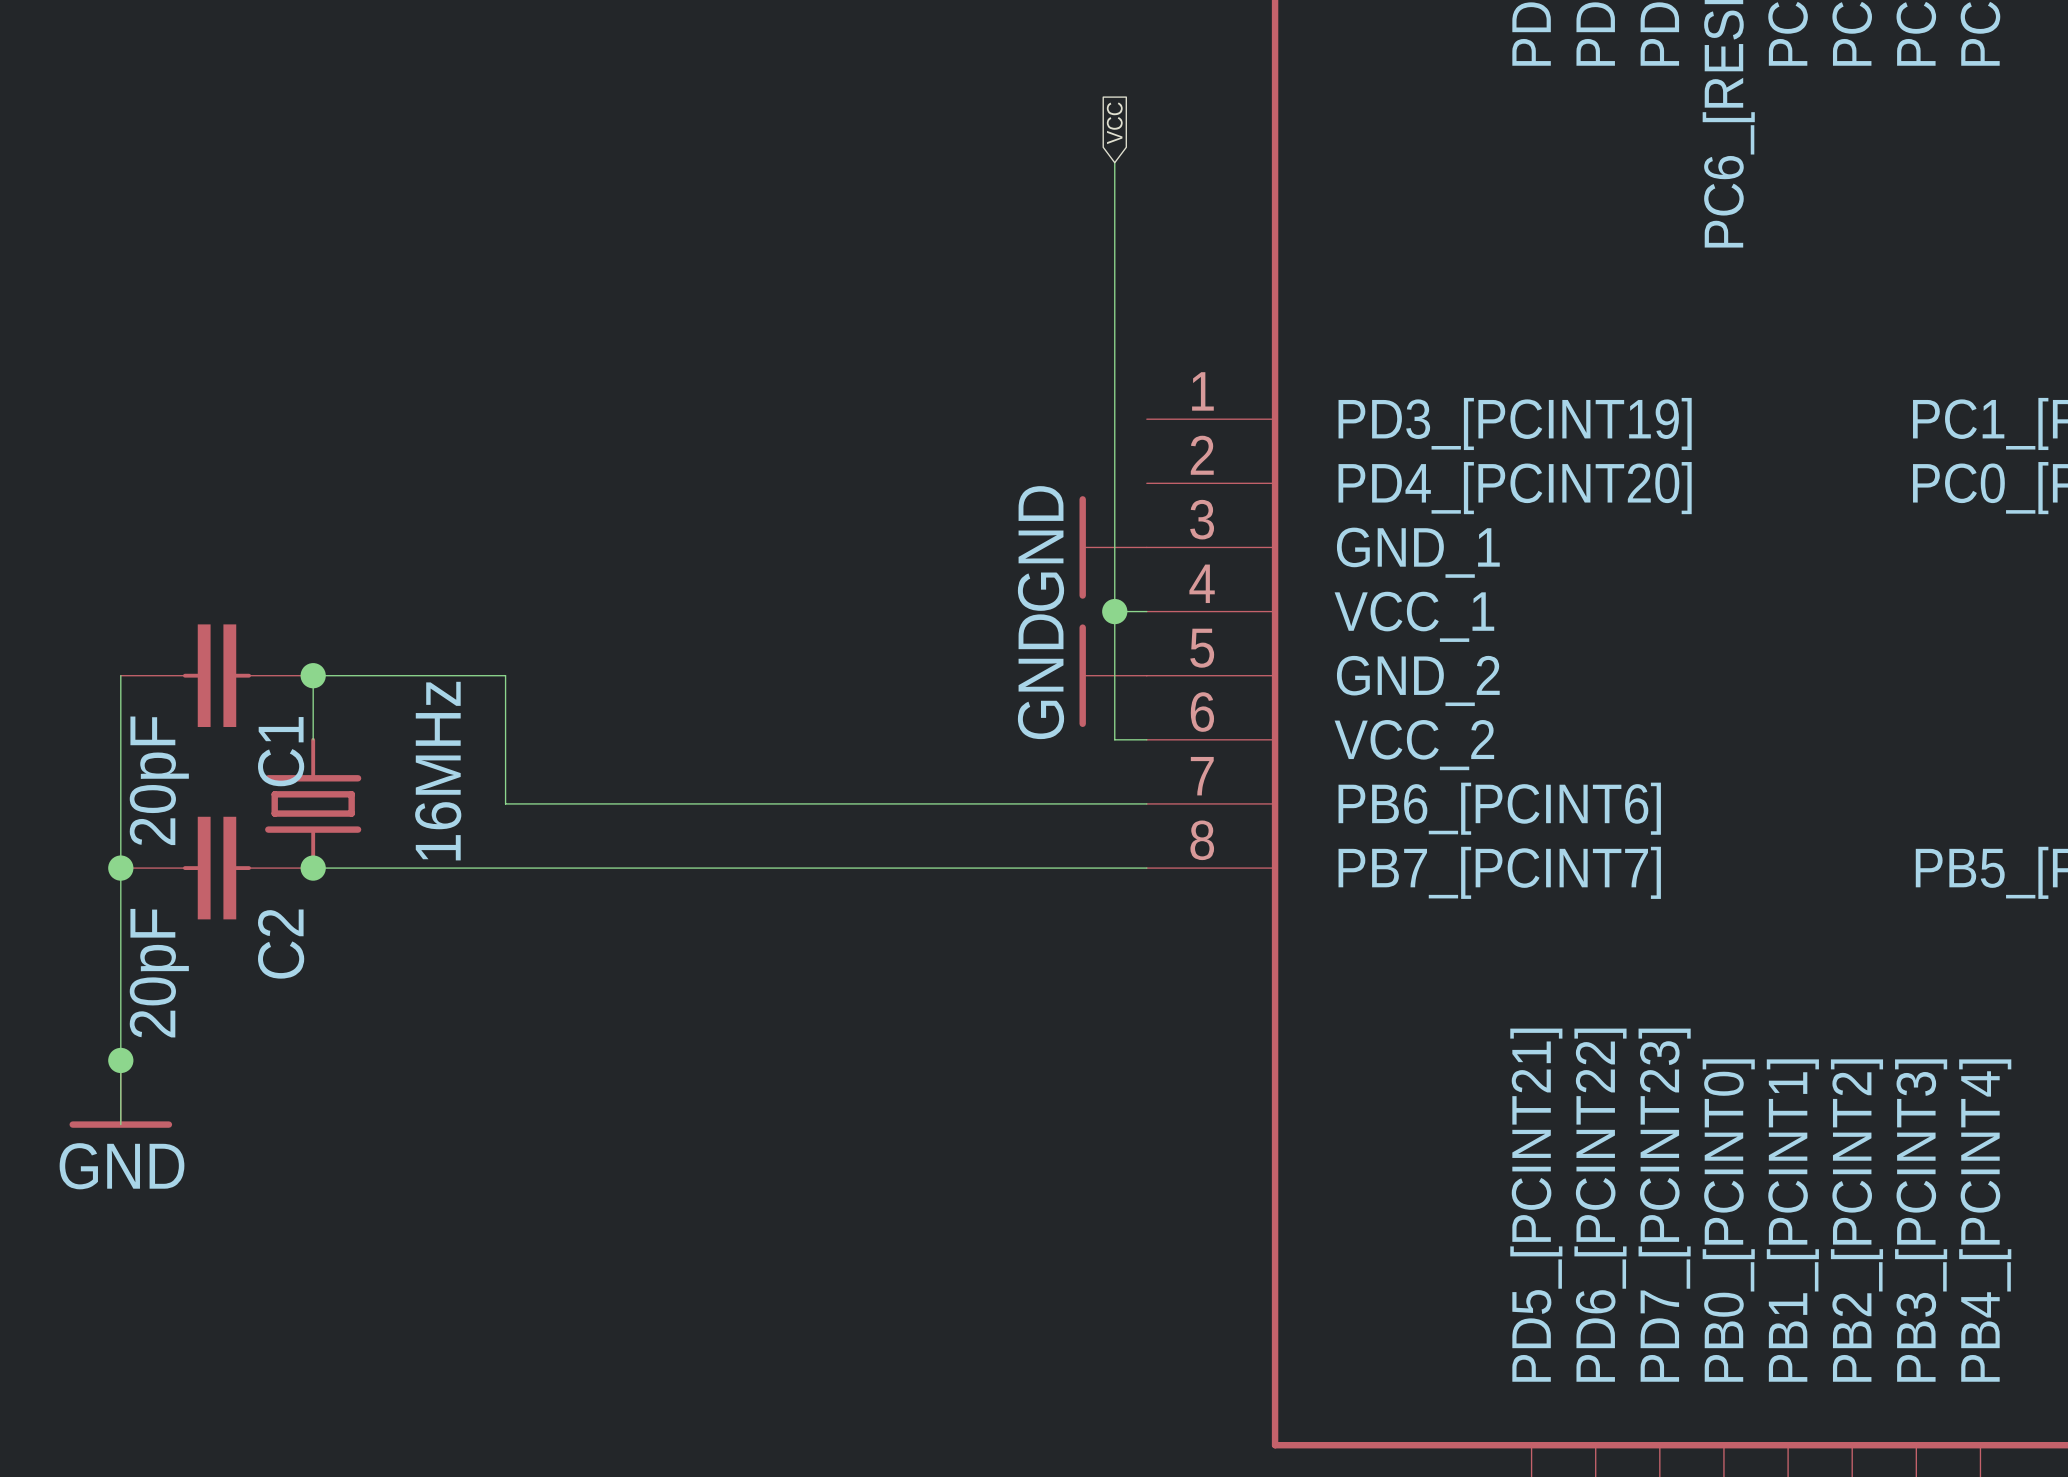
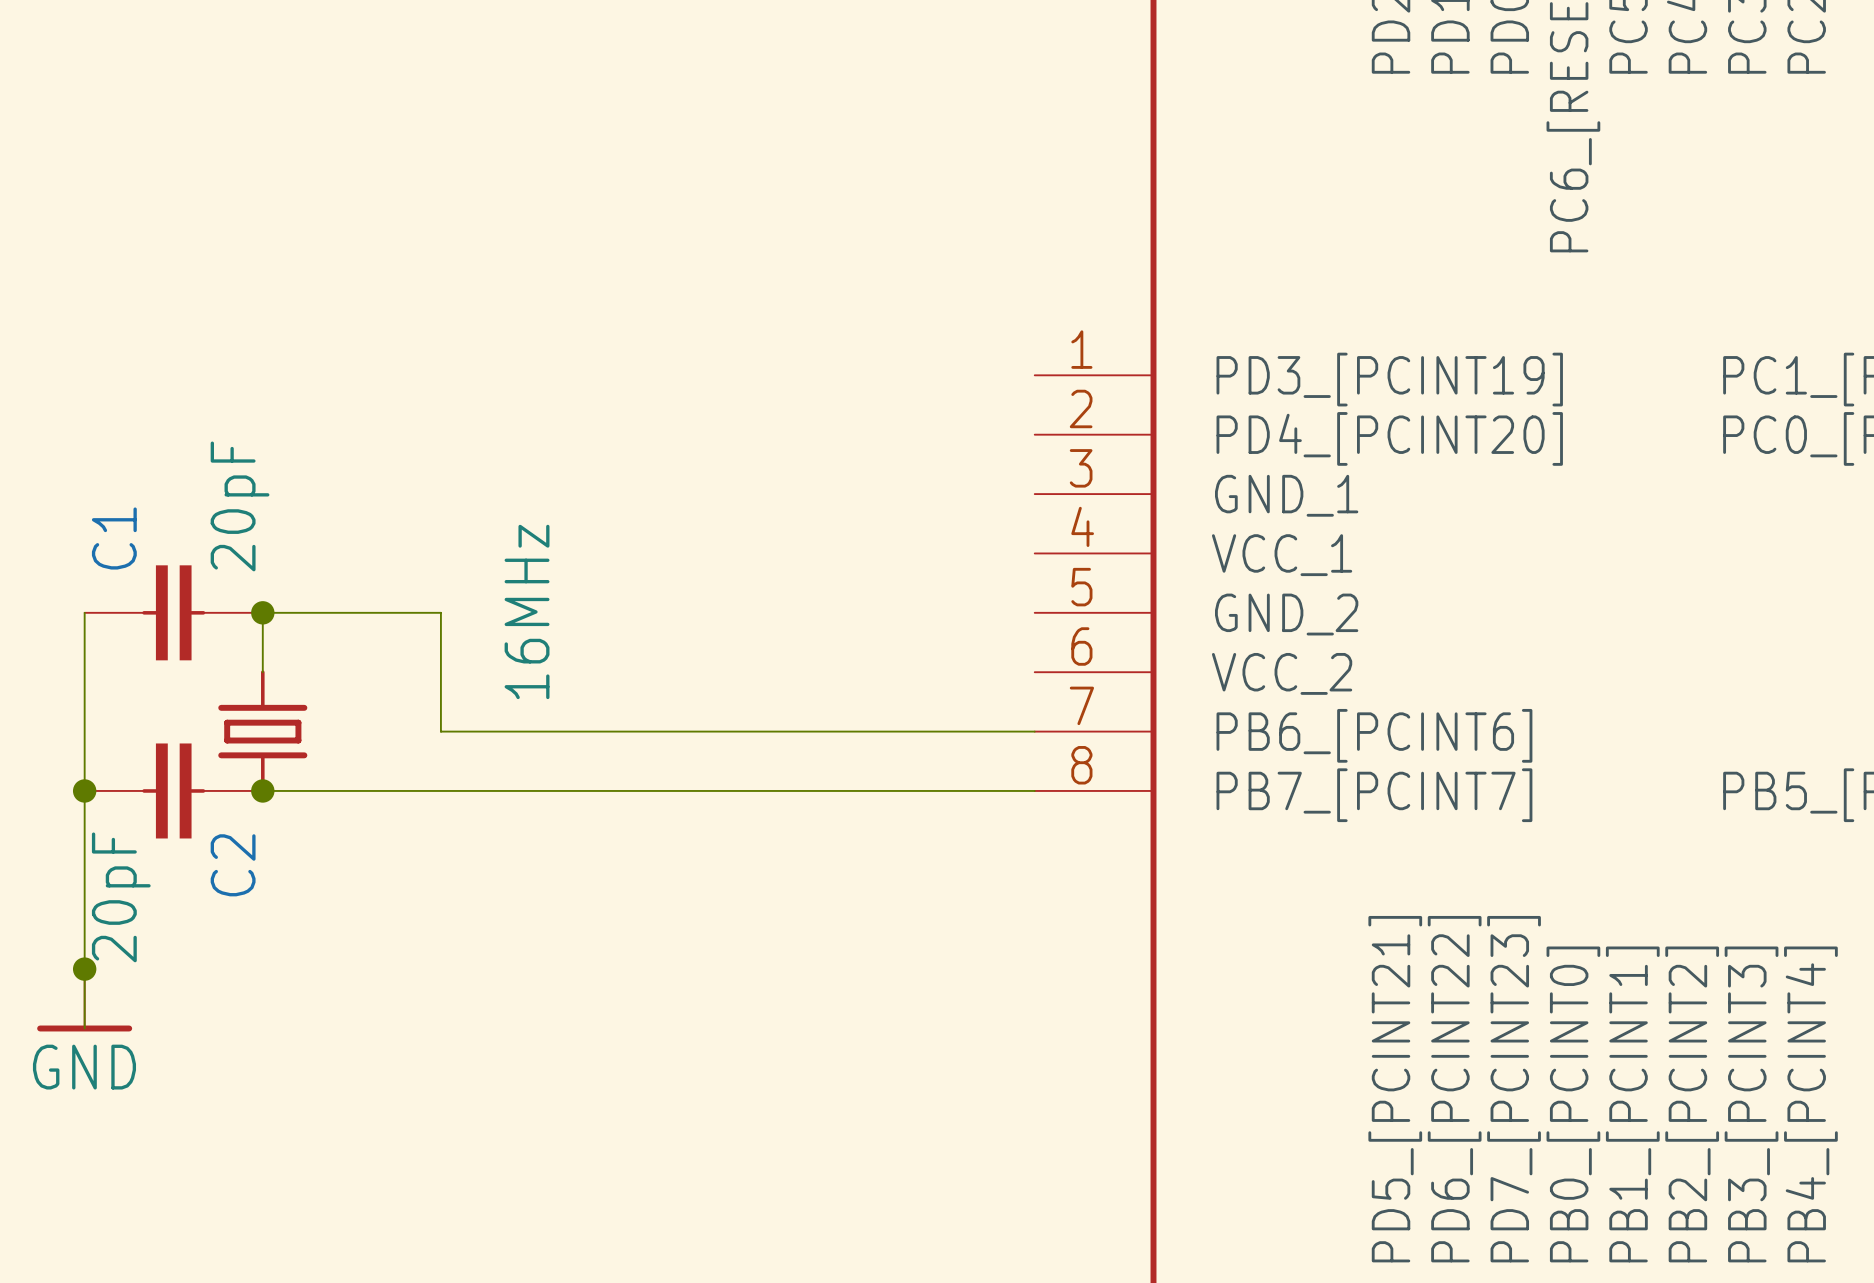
global label: VCC (1114, 123) -> none
wire: (1114, 162) (1114, 739) (1146, 739) -> none
power symbol: GND (1113, 547) -> none
wire: (1114, 611) (1146, 611) -> none
junction: (1114, 611) -> none
power symbol: GND (1113, 675) -> none
C1 name position: C1 (281, 751) -> C1 (114, 538)
part value position: 16MHz (438, 771) -> 16MHz (527, 611)
C1 value position: 20pF (159, 780) -> 20pF (240, 506)

